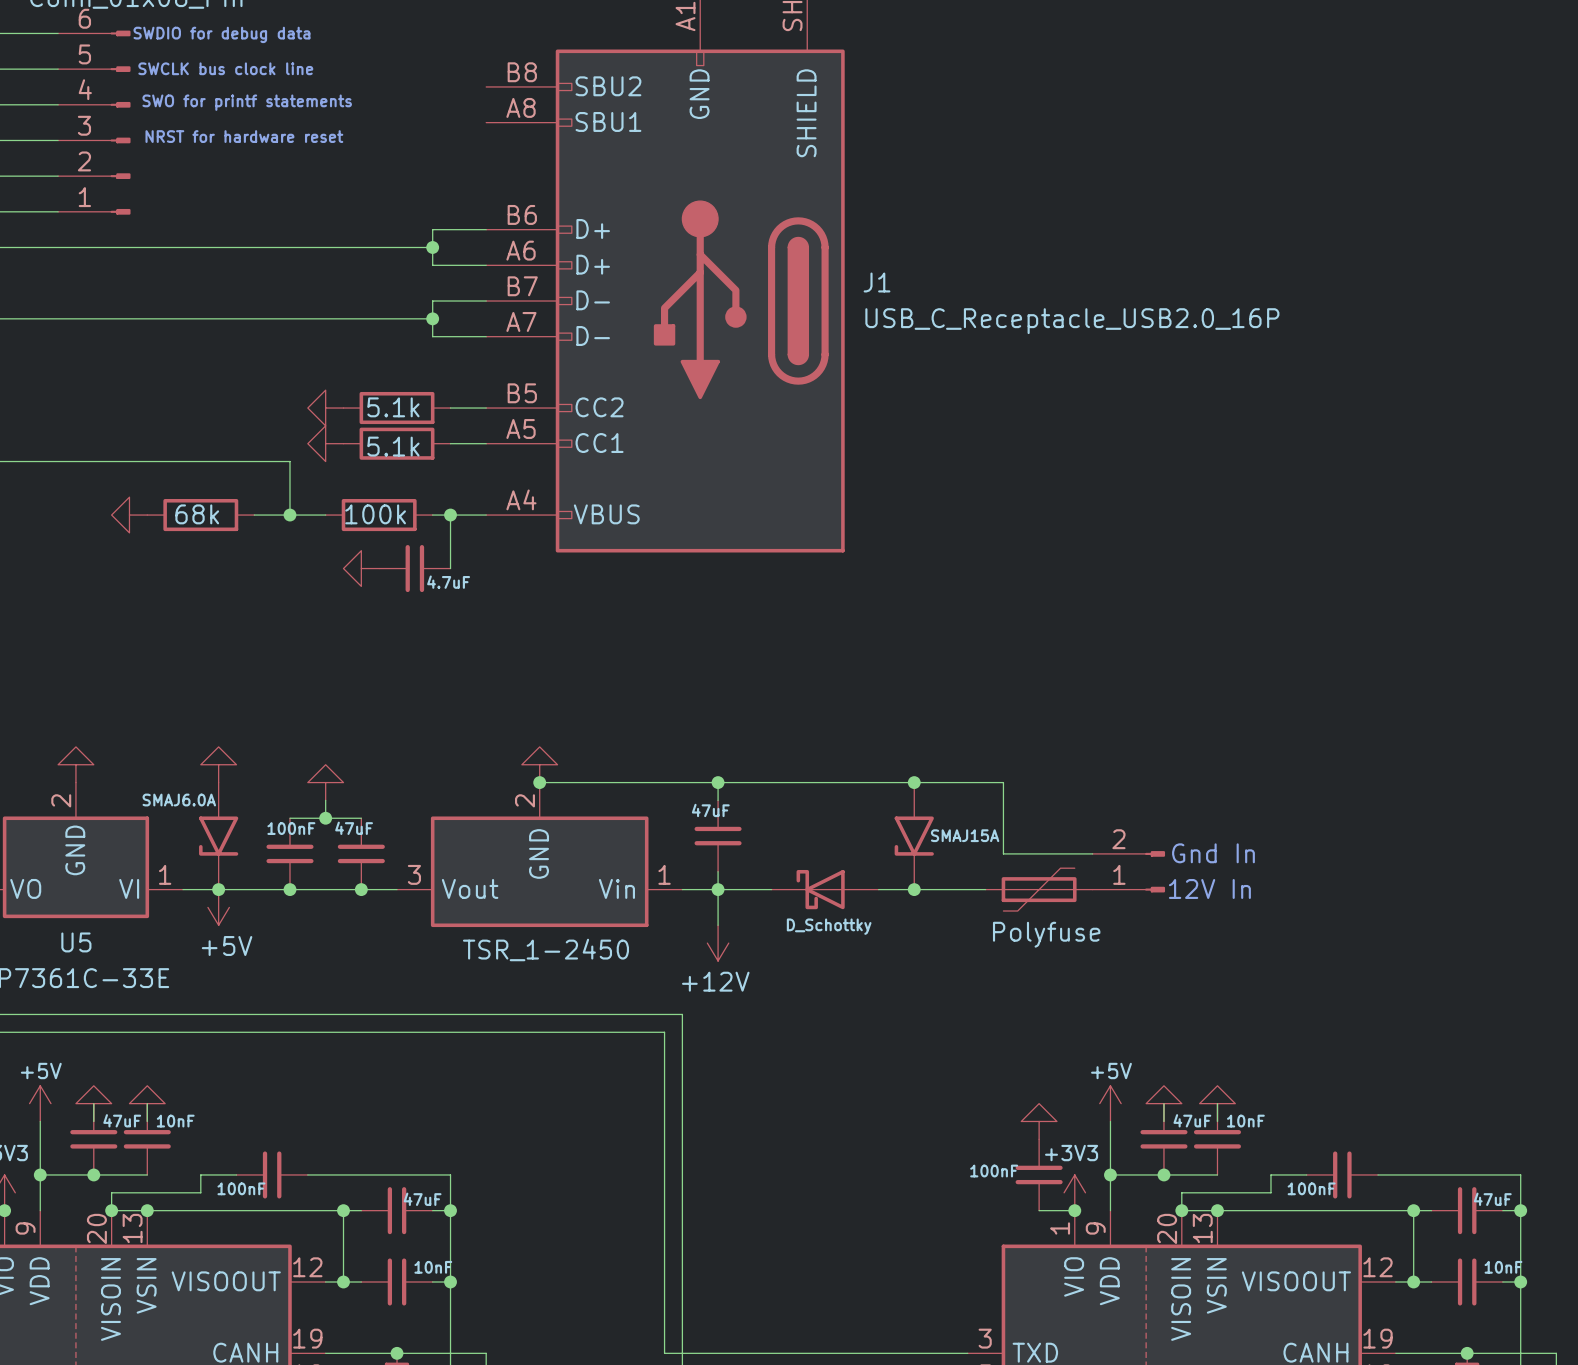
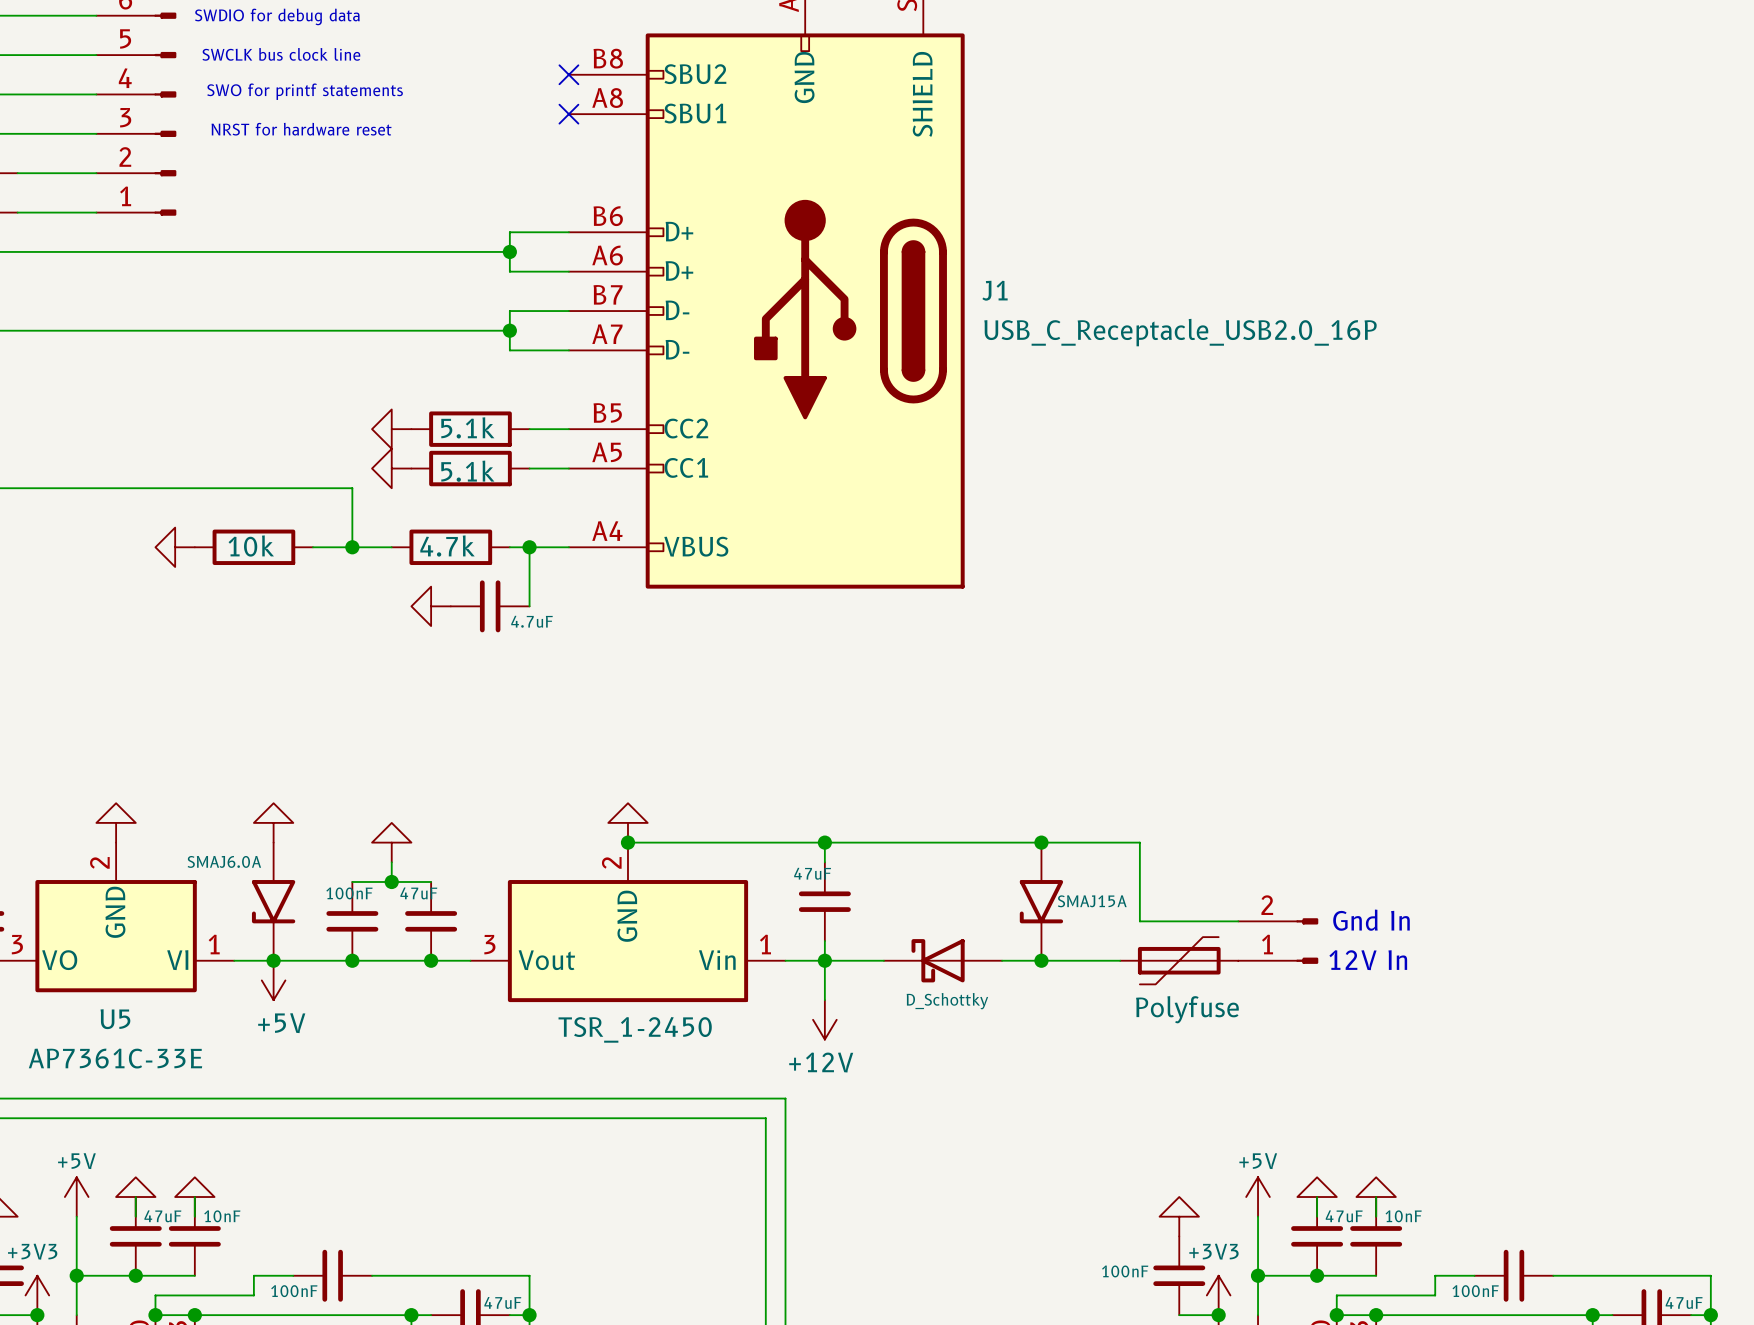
no-connect mark: none -> (568, 74)
no-connect mark: none -> (568, 114)
part value: 68k (197, 514) -> 10k (251, 546)
part value: 100k (375, 514) -> 4.7k (447, 546)

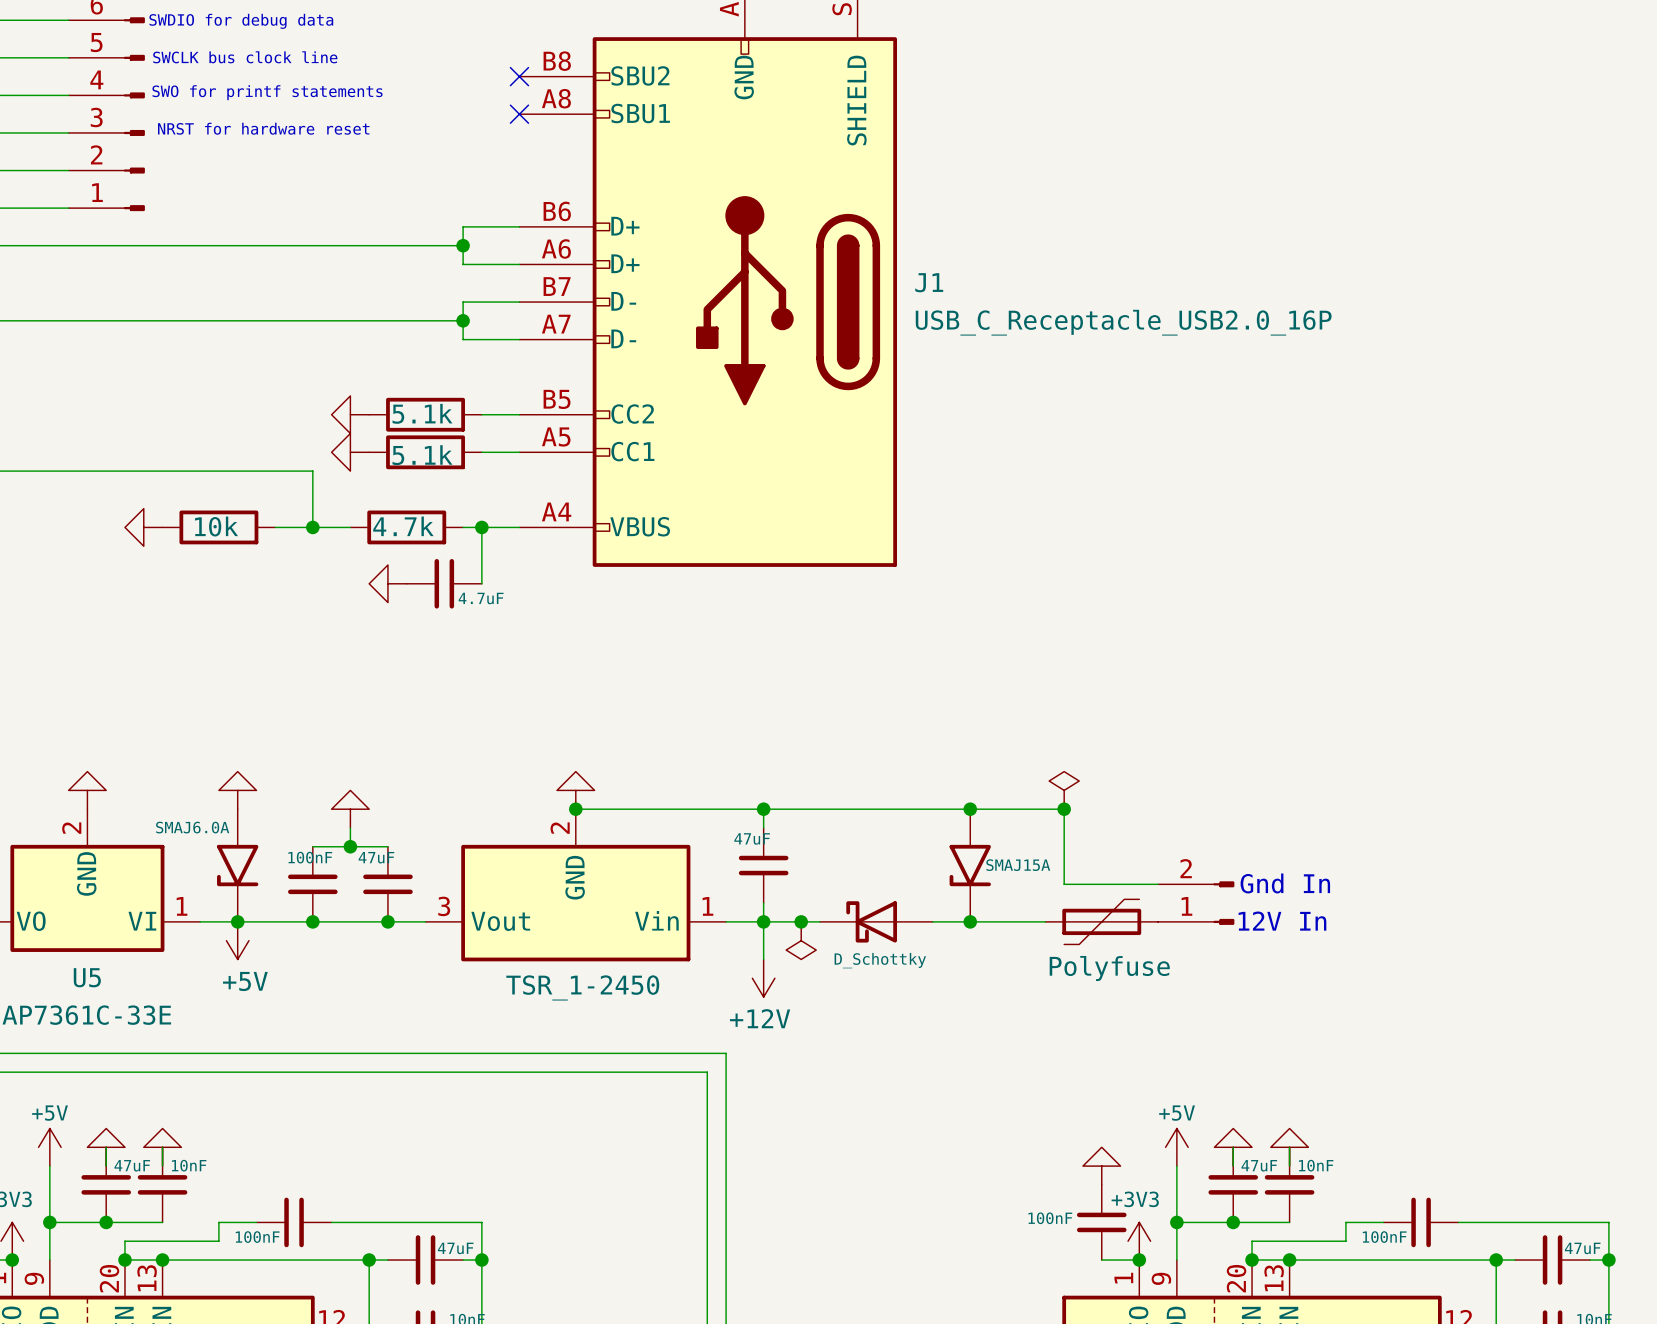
power symbol: none -> (1064, 790)
junction: none -> (1064, 809)
junction: none -> (801, 921)
power symbol: none -> (801, 940)

